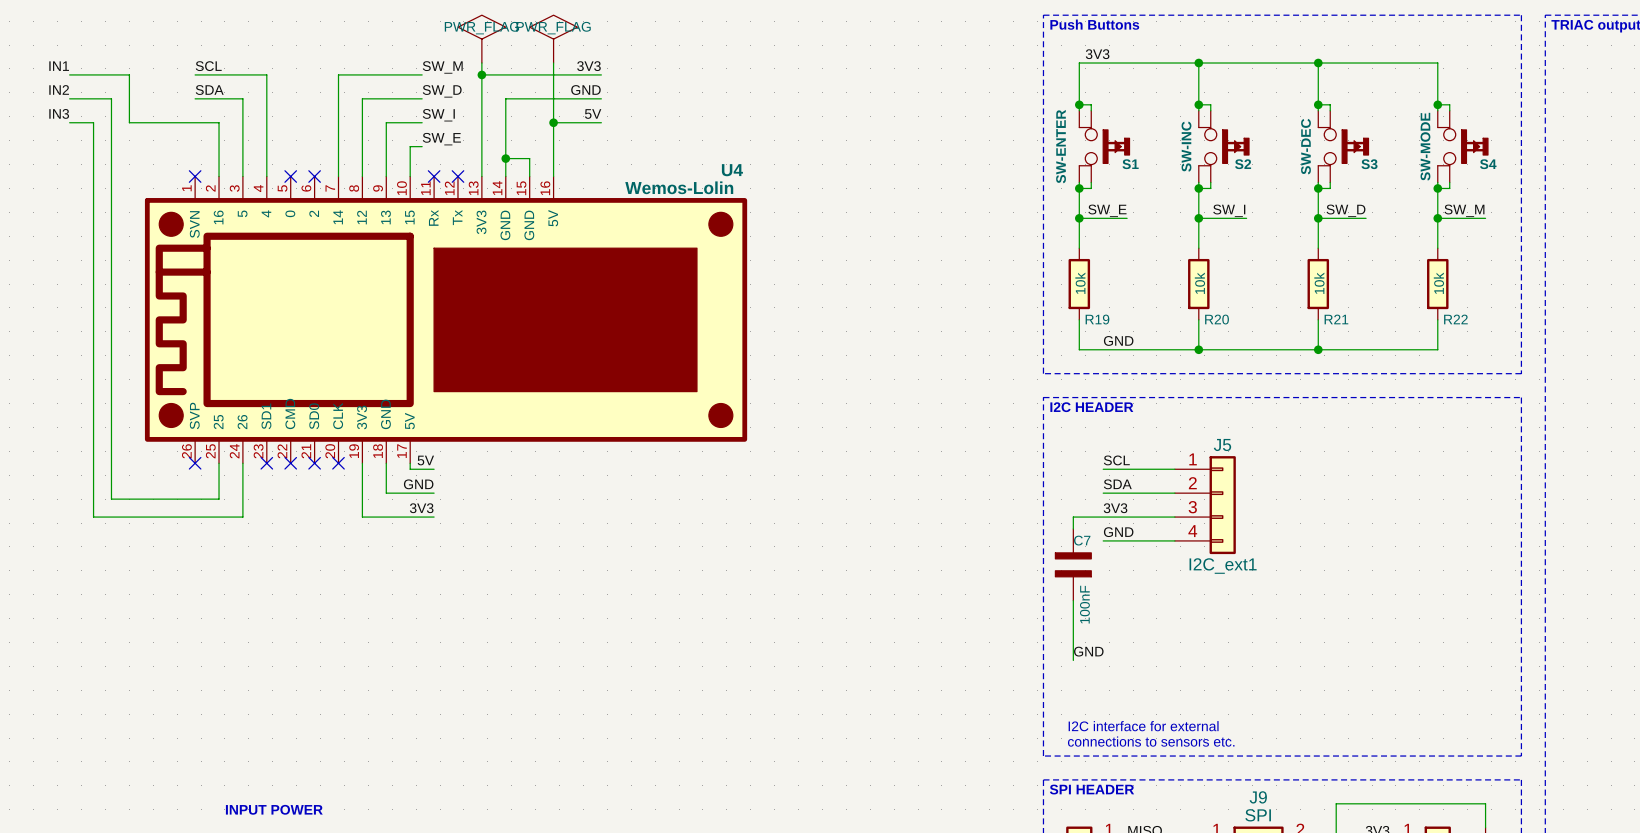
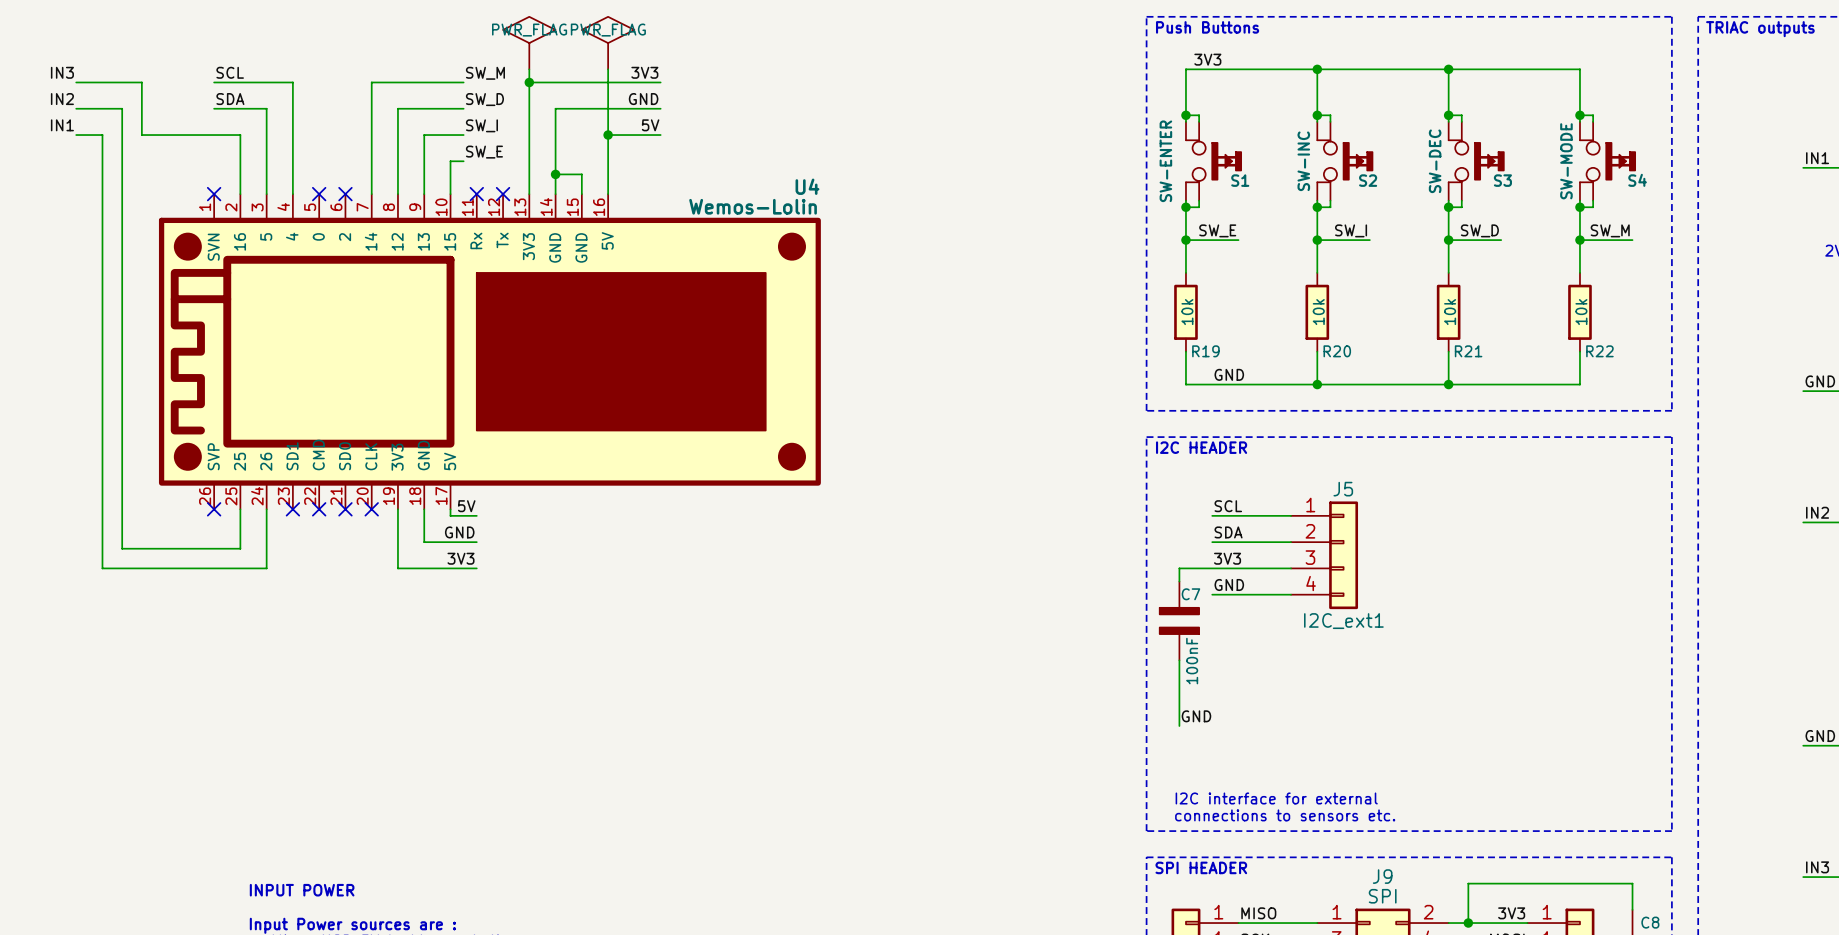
label: IN1 (59, 66) -> IN3 (62, 72)
label: IN3 (59, 113) -> IN1 (62, 125)

